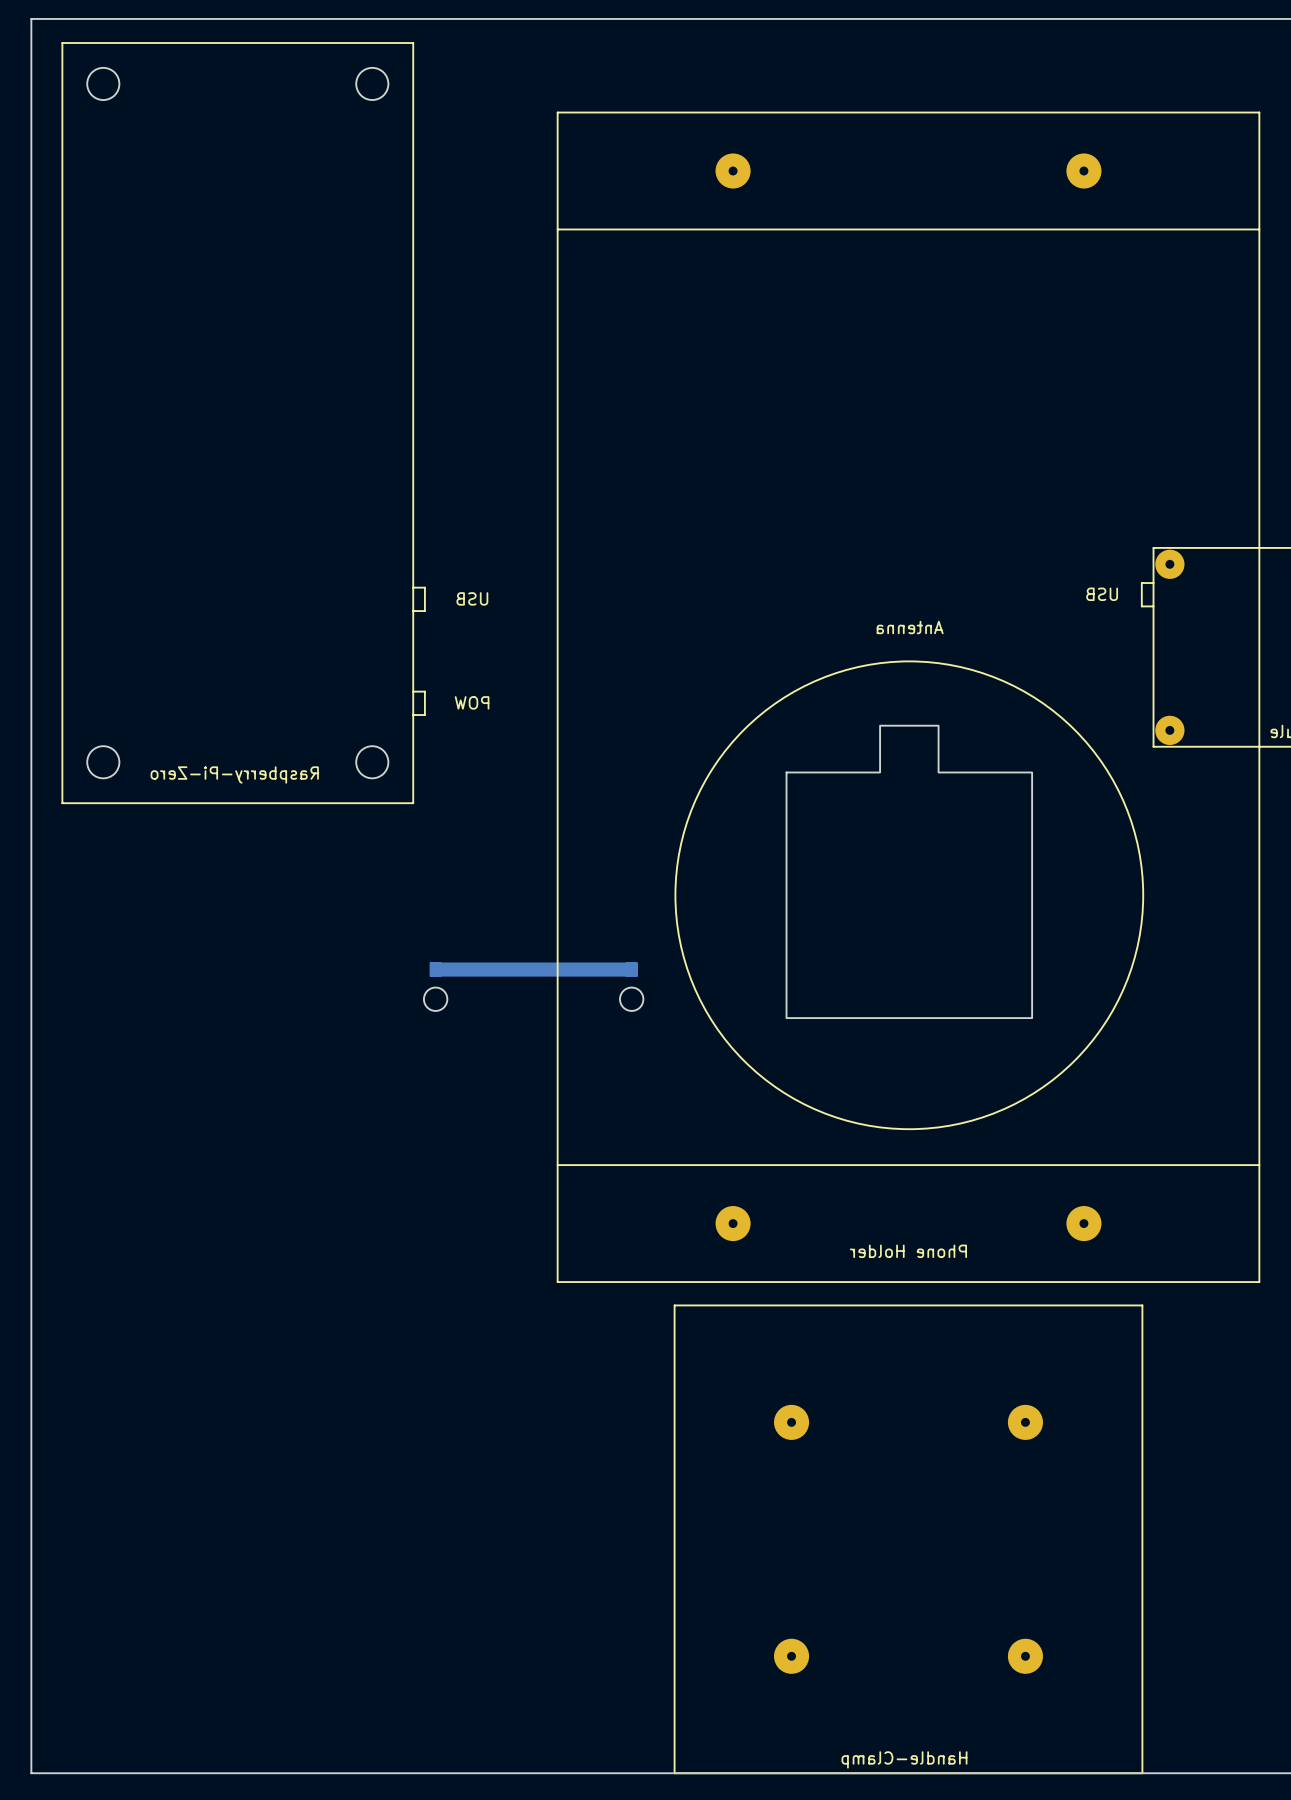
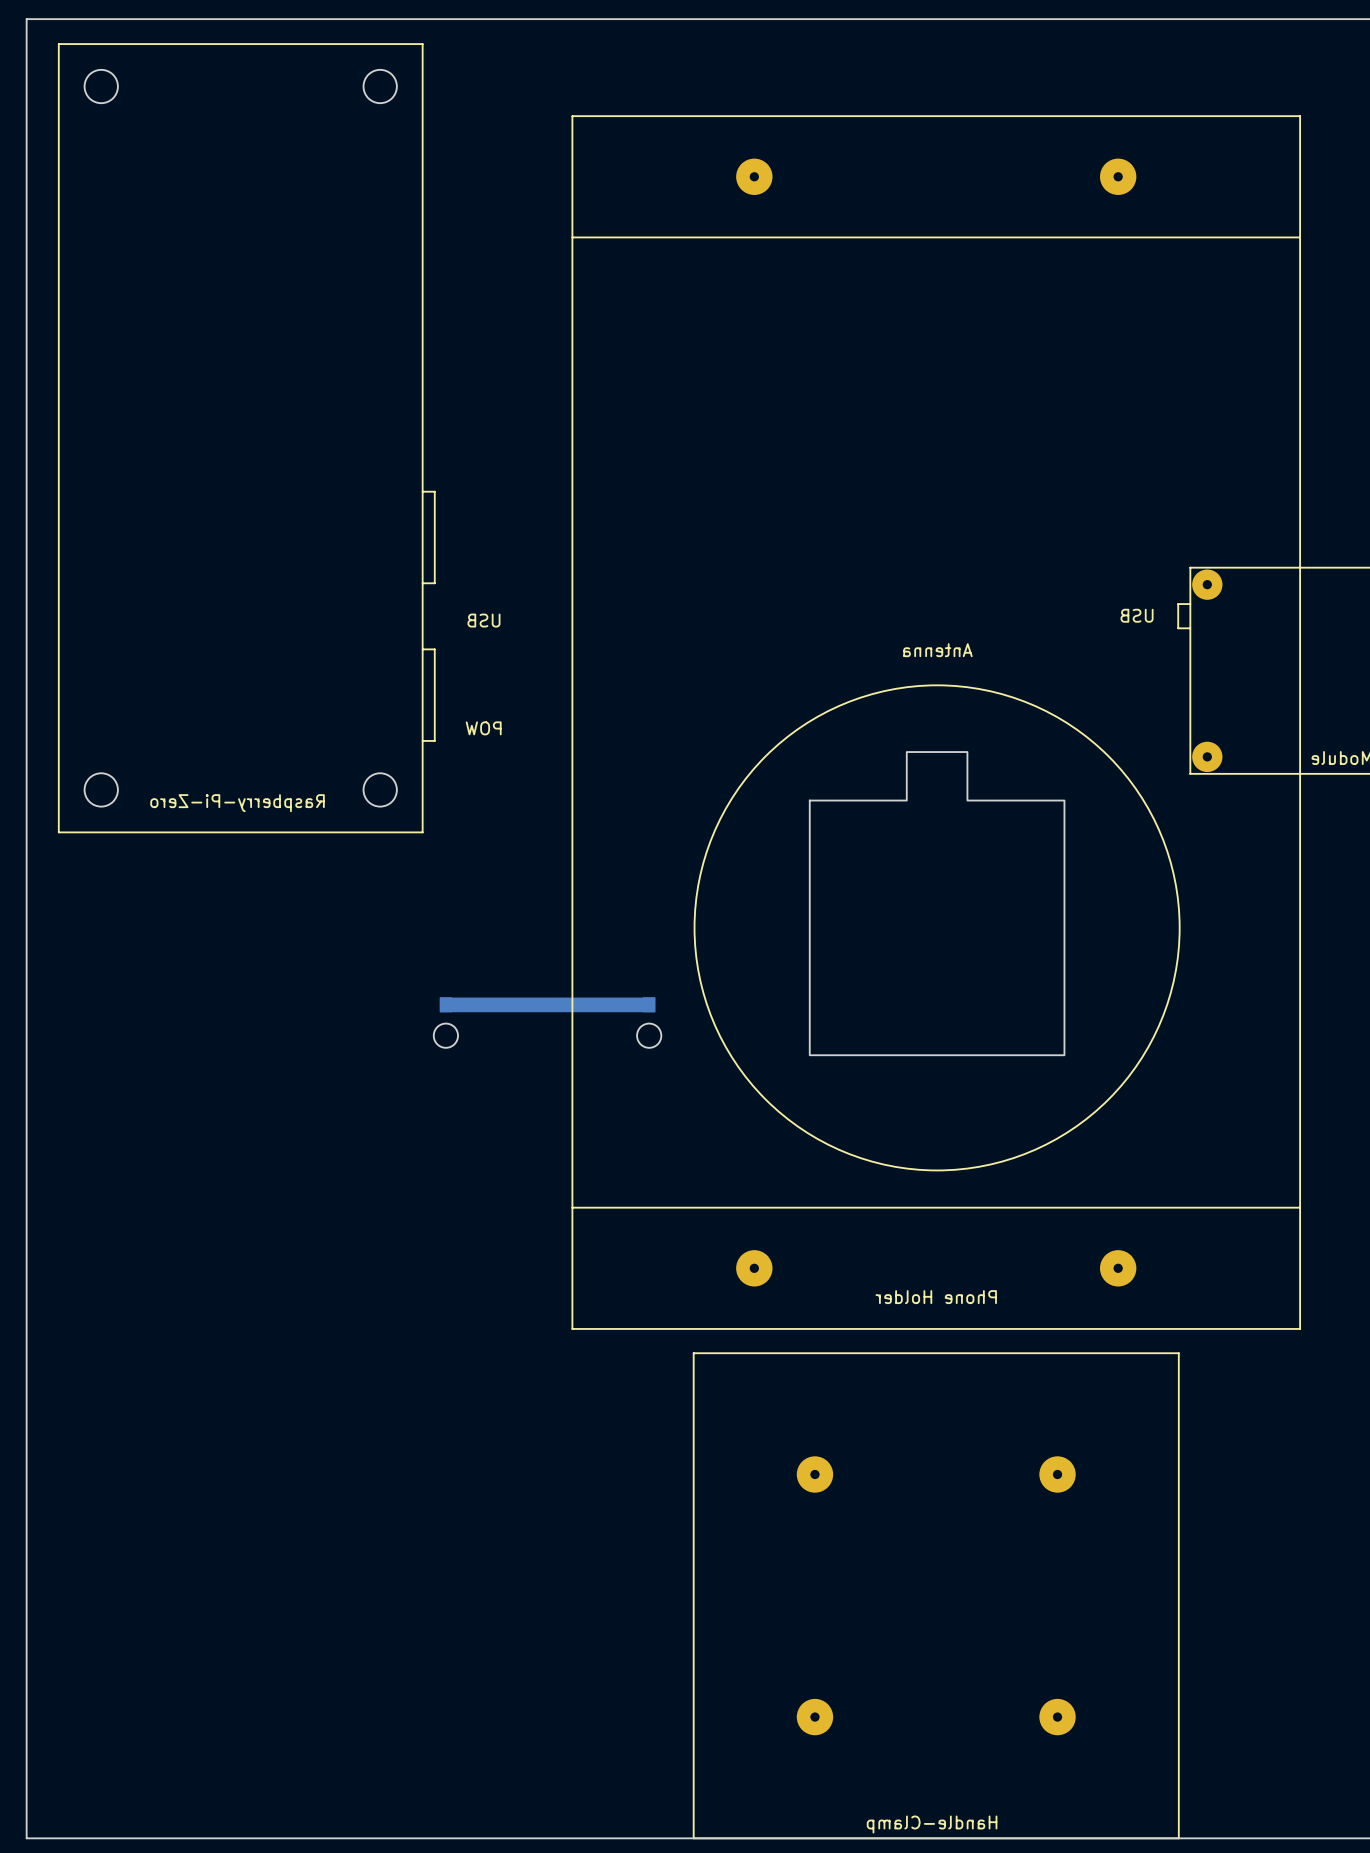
part footprint: [61, 42, 426, 804] -> [58, 43, 436, 834]

